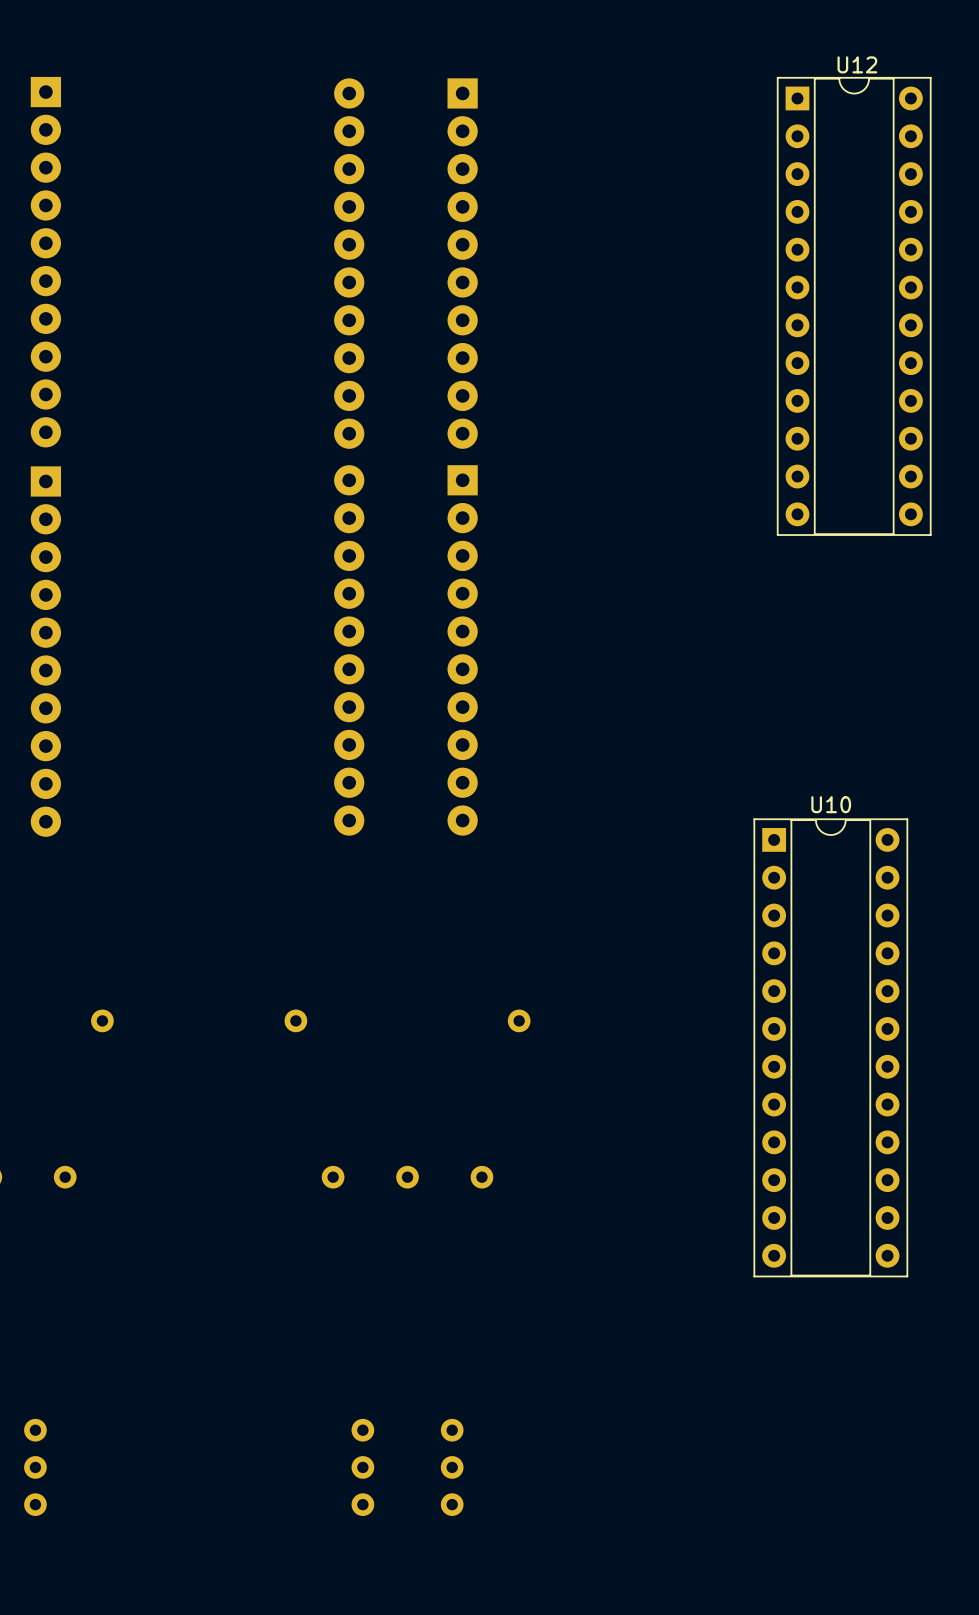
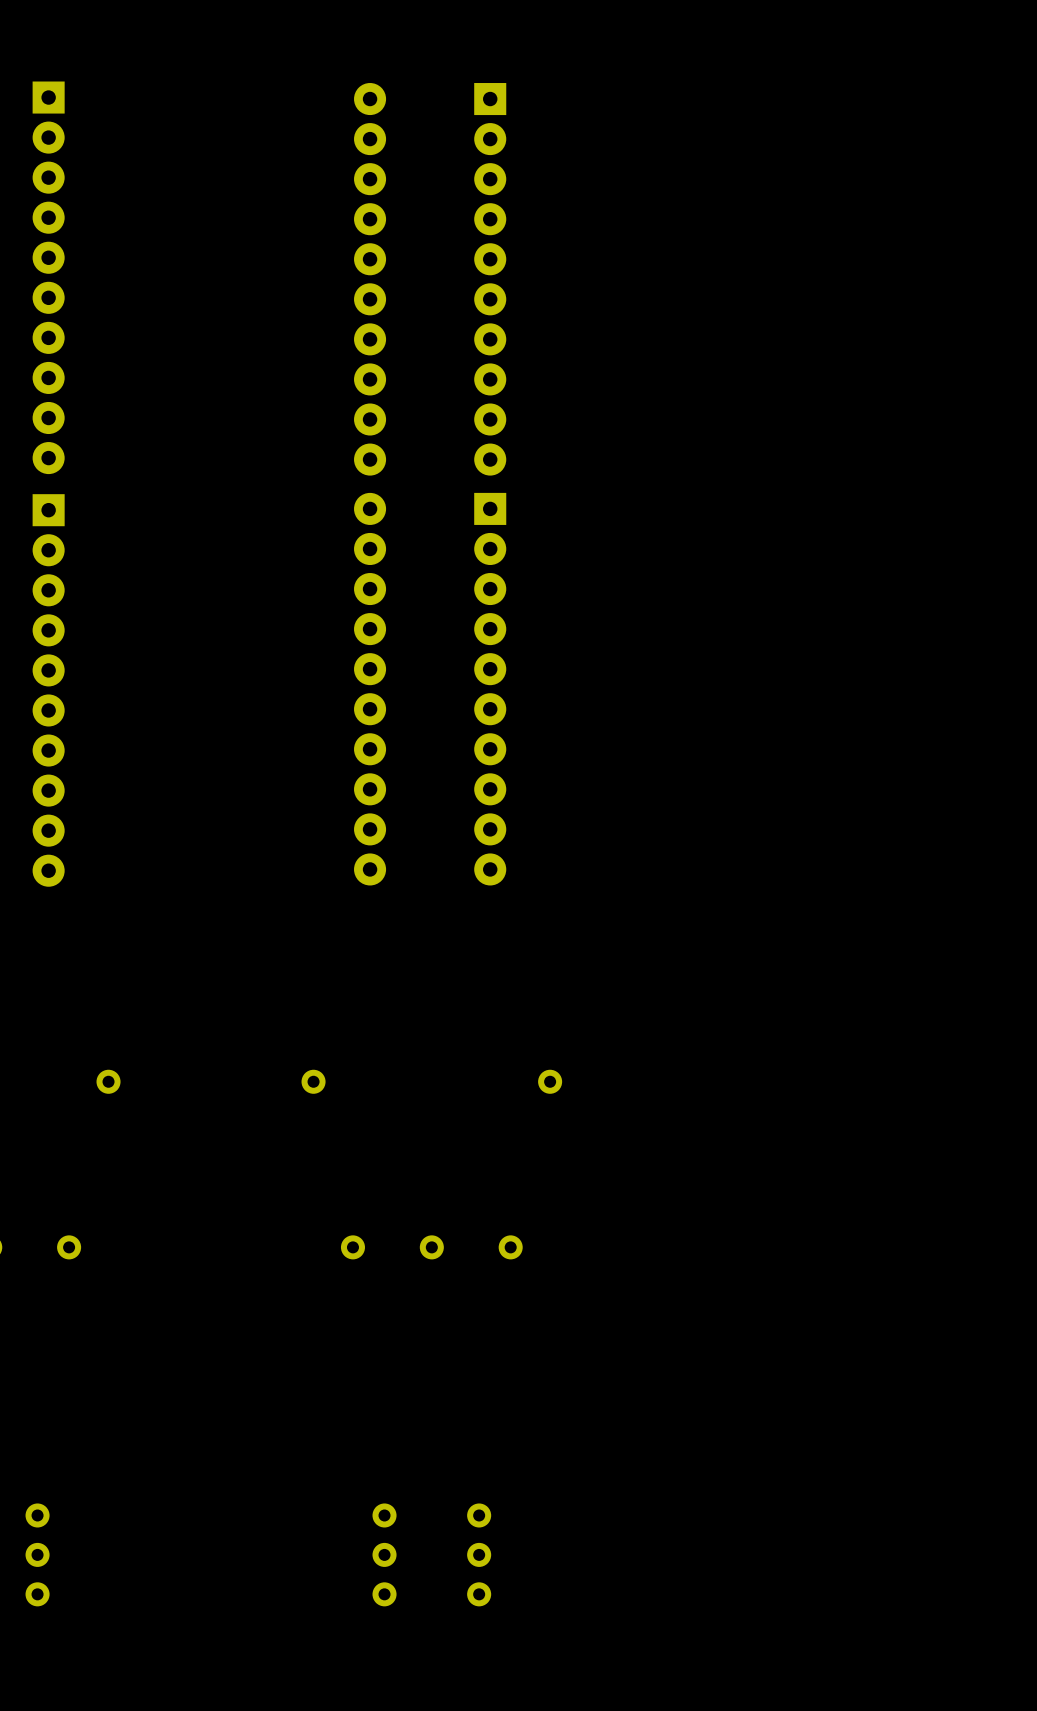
U12: (854, 306) -> none
U10: (830, 1047) -> none

